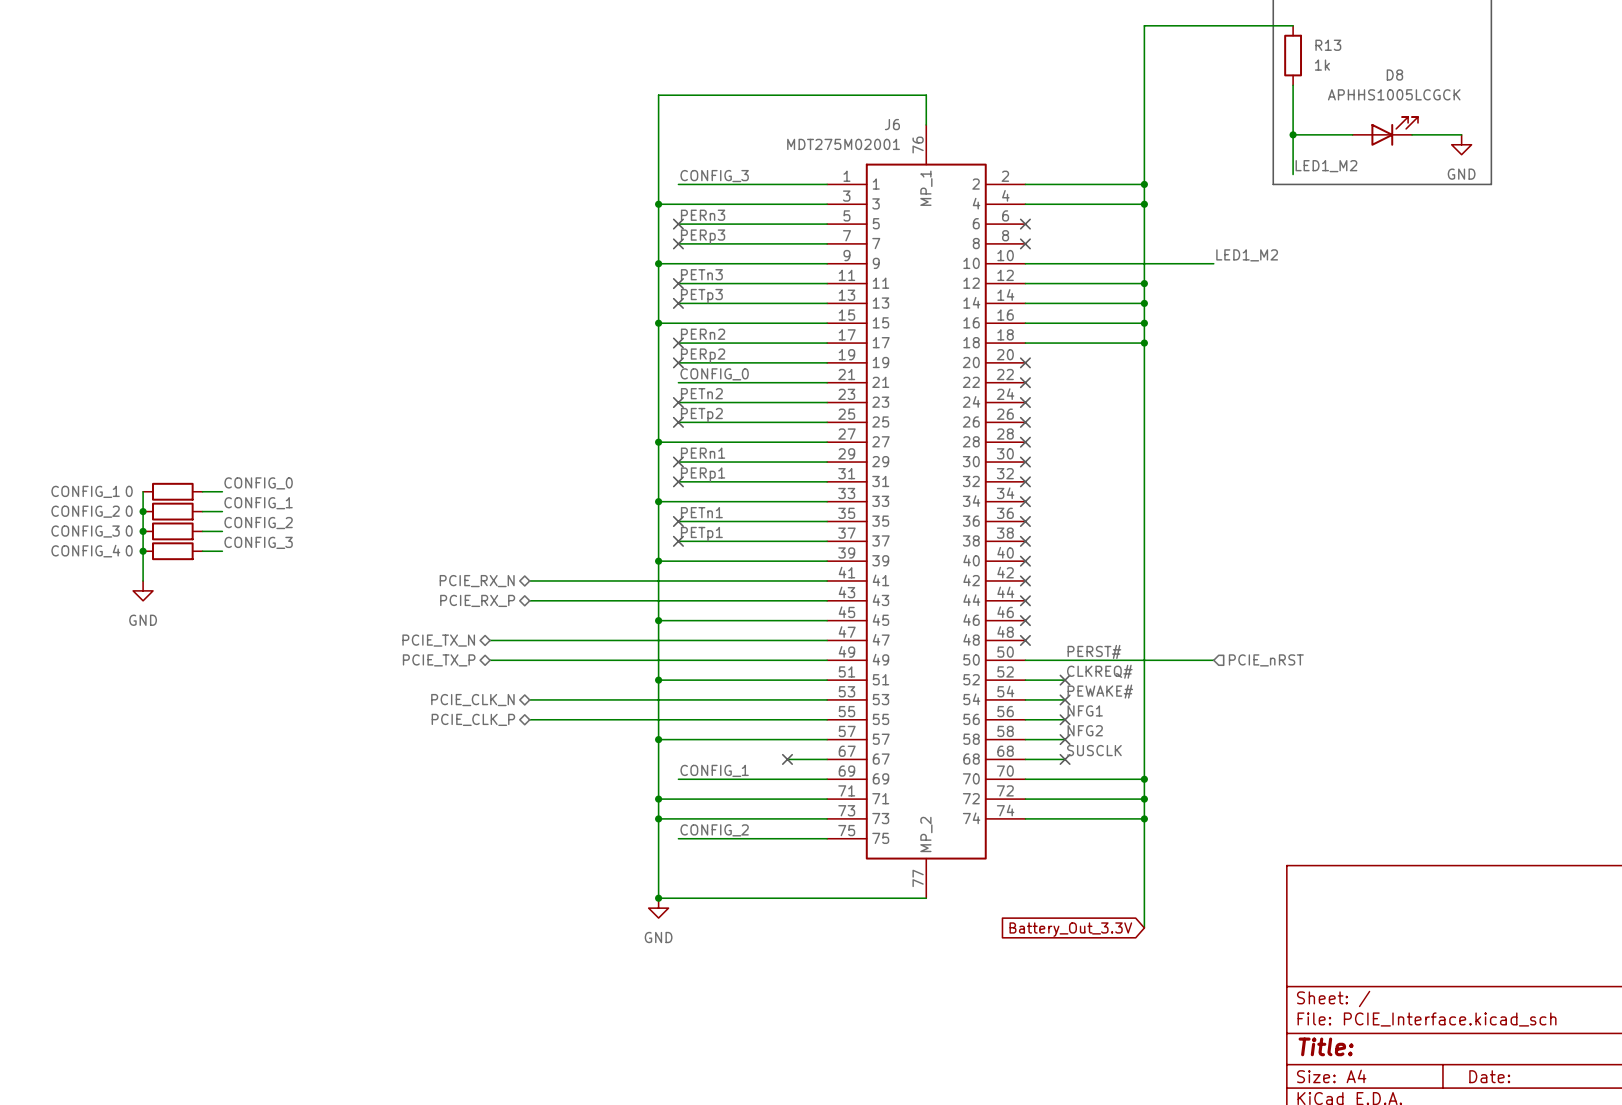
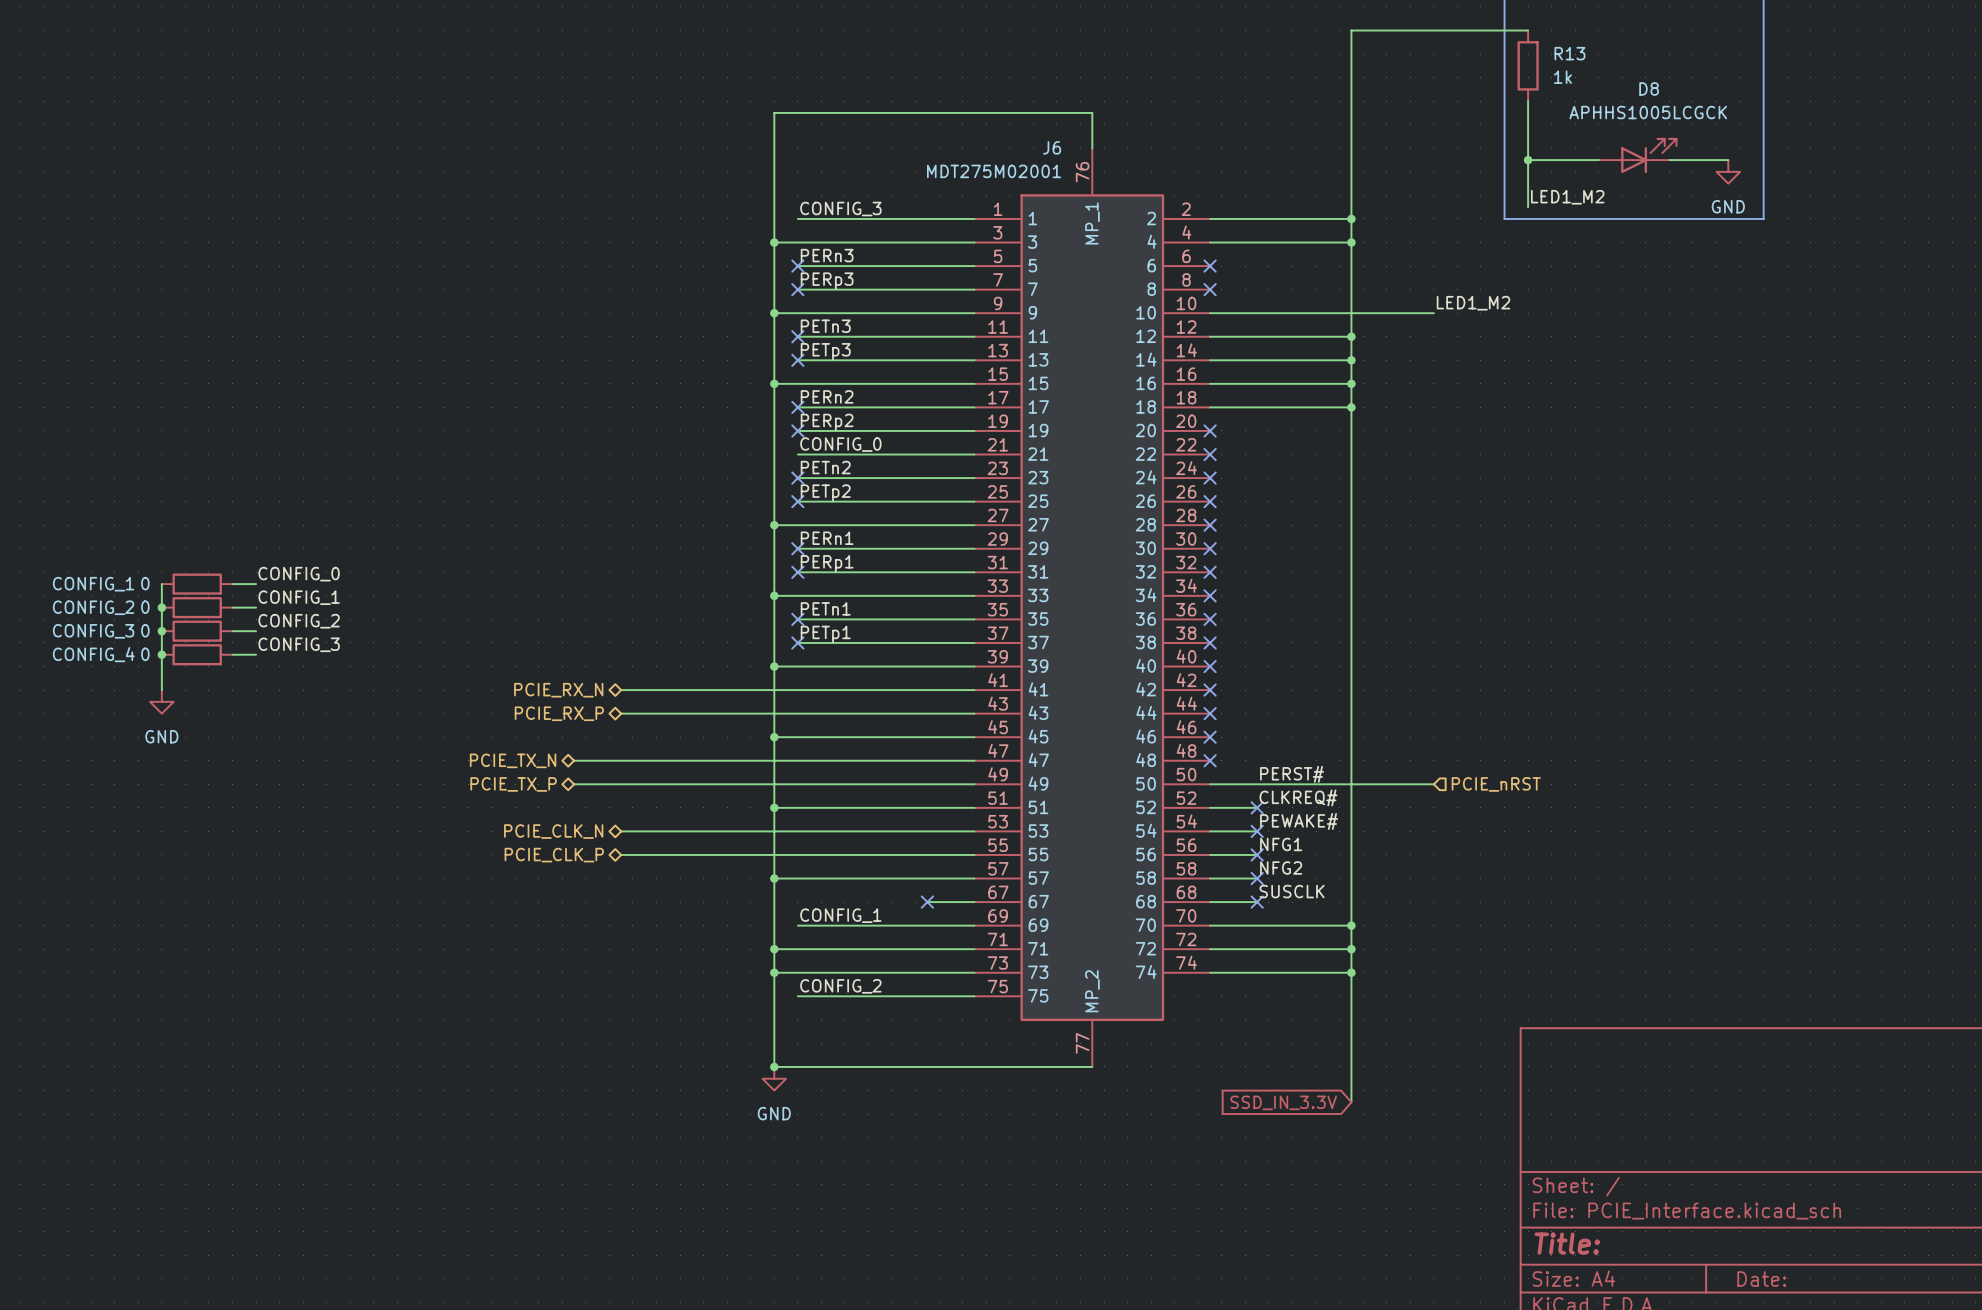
global label: Battery_Out_3.3V (1070, 929) -> SSD_IN_3.3V (1283, 1102)

